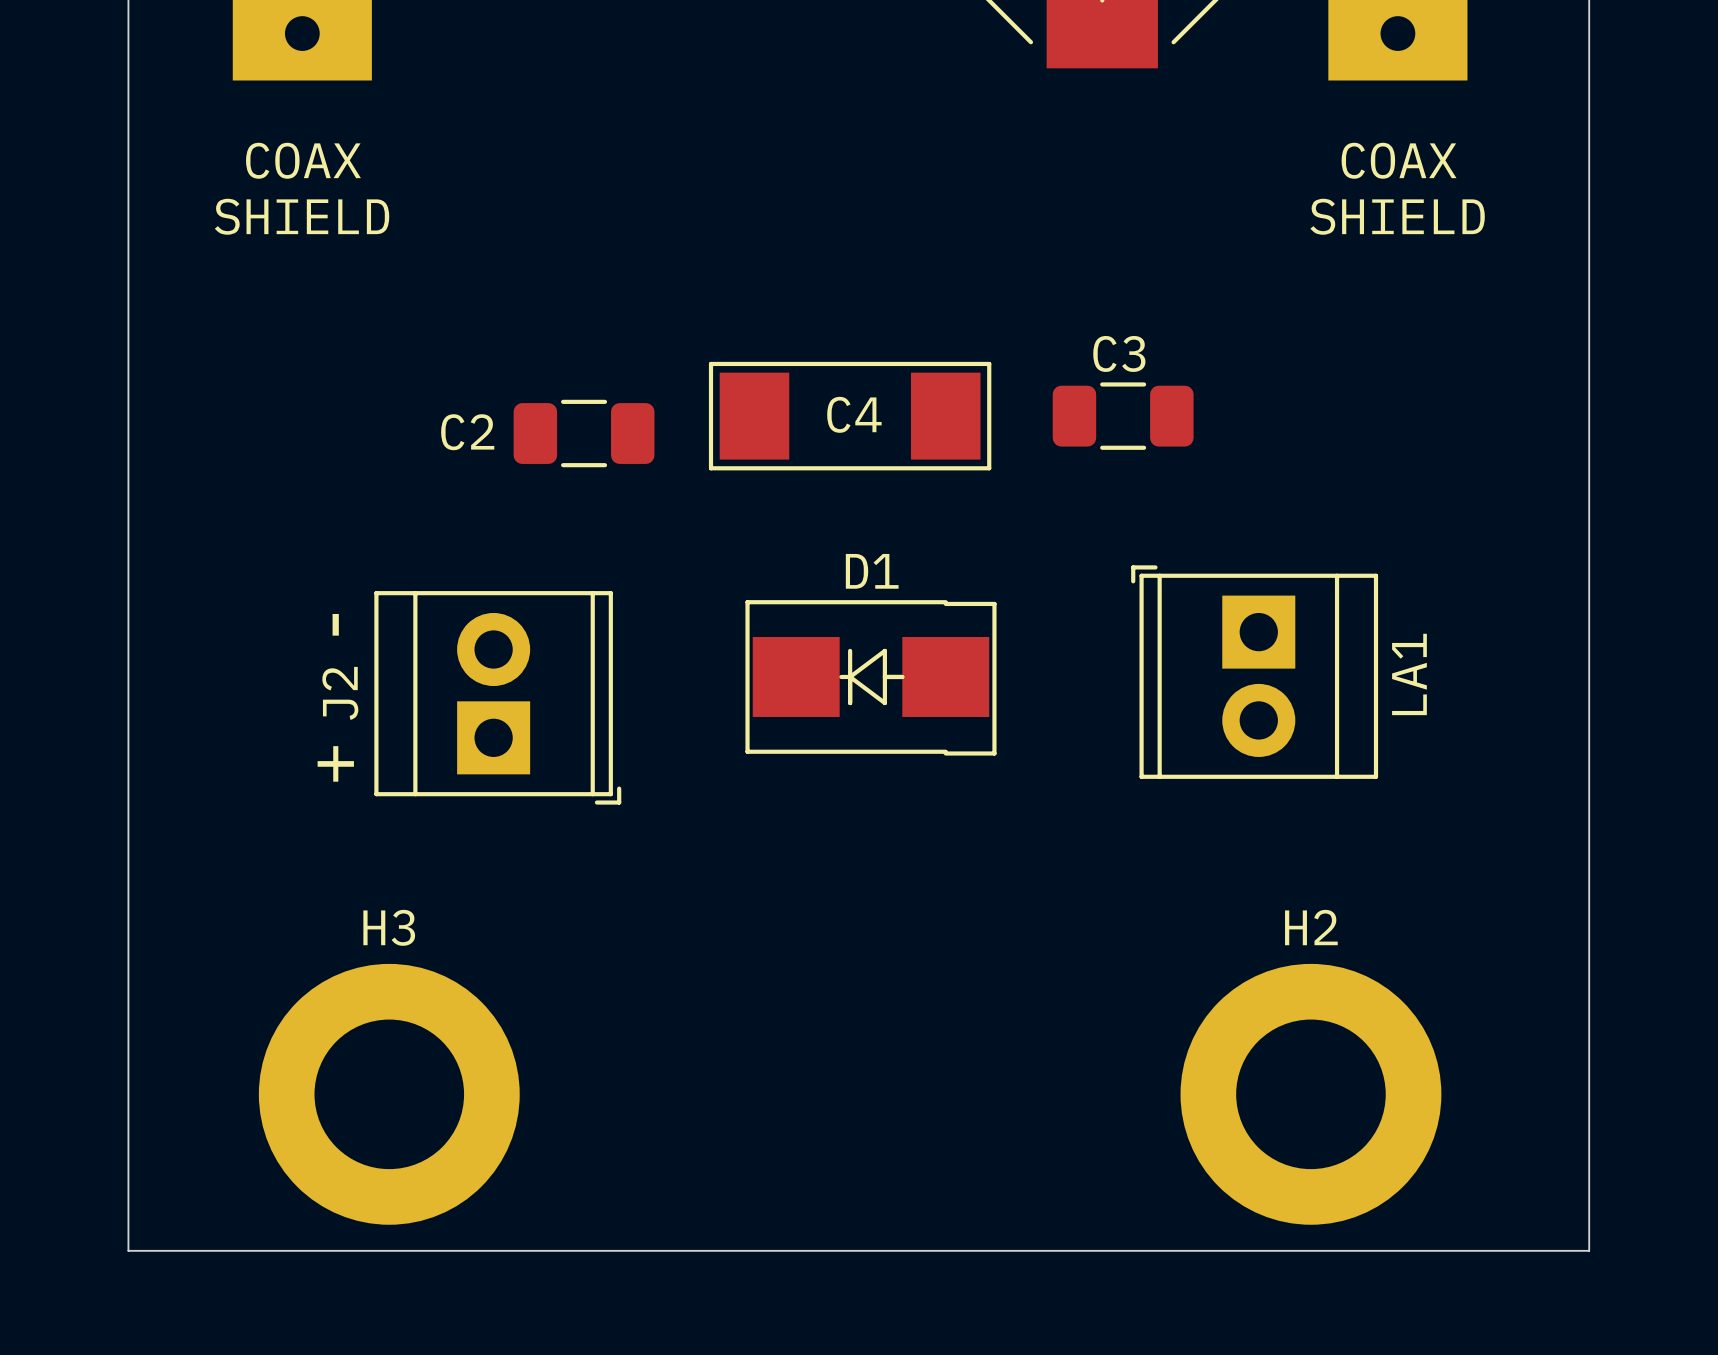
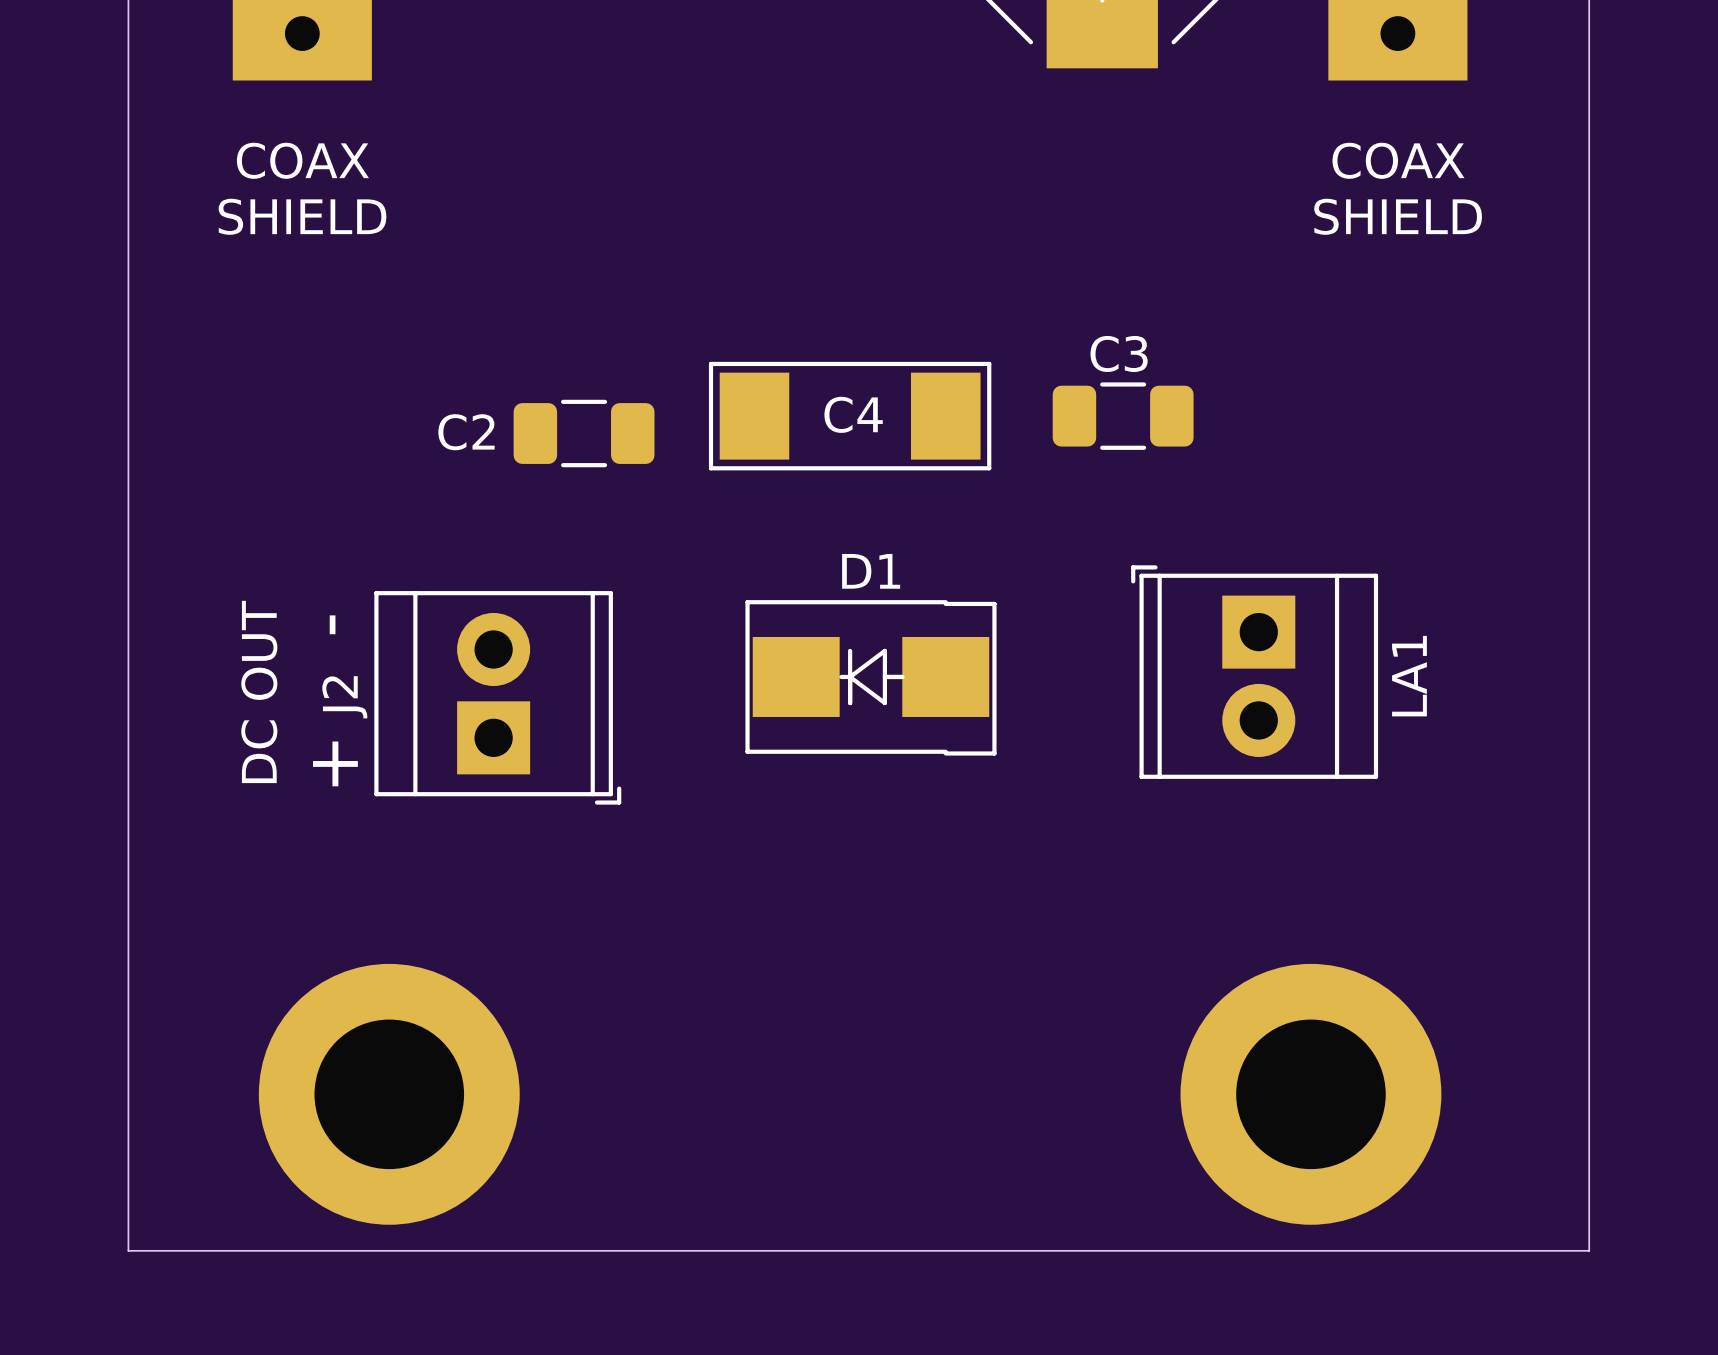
text: none -> DC OUT (259, 691)
H3 name: H3 (389, 927) -> none
H2 name: H2 (1311, 927) -> none

